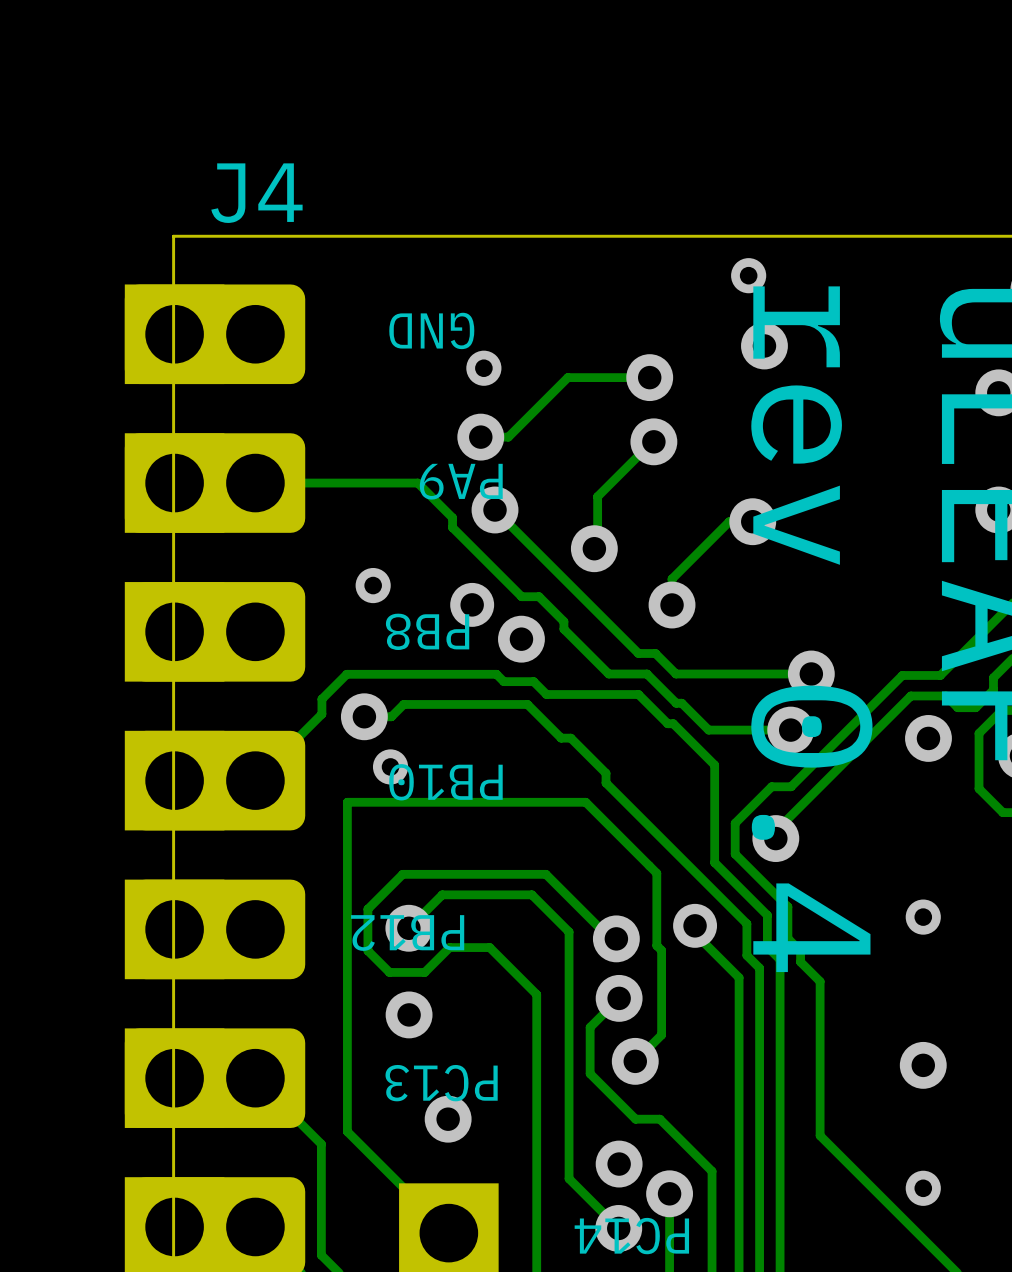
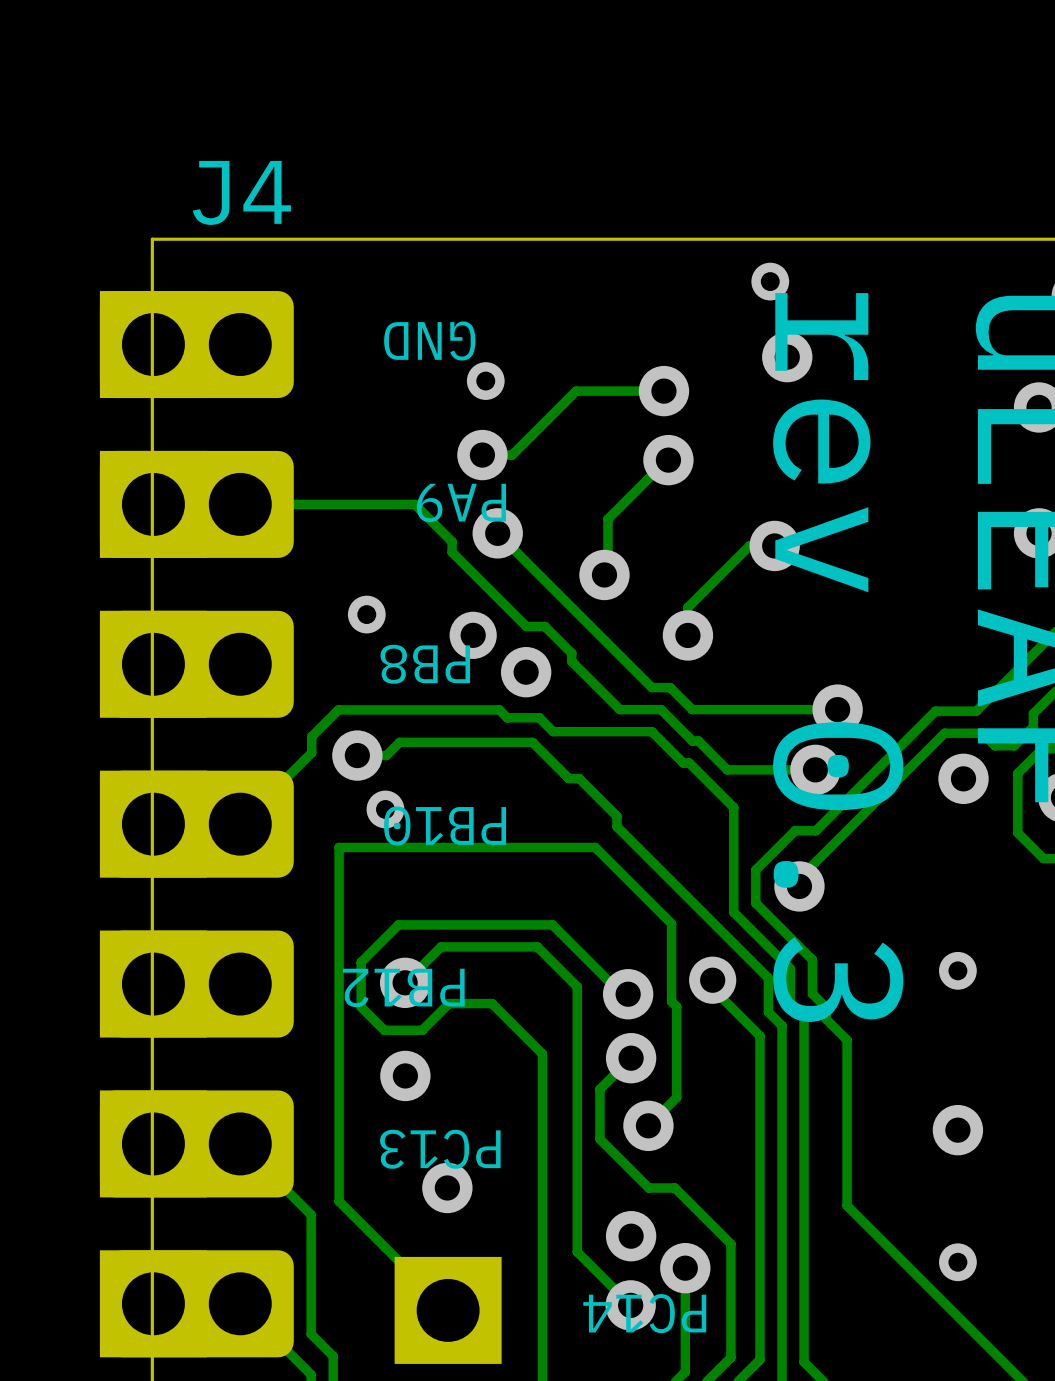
text: rev 0.4 (811, 629) -> rev 0.3 (838, 657)

